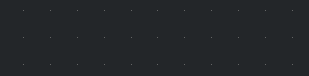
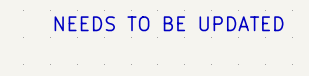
text: none -> NEEDS TO BE UPDATED (169, 23)

